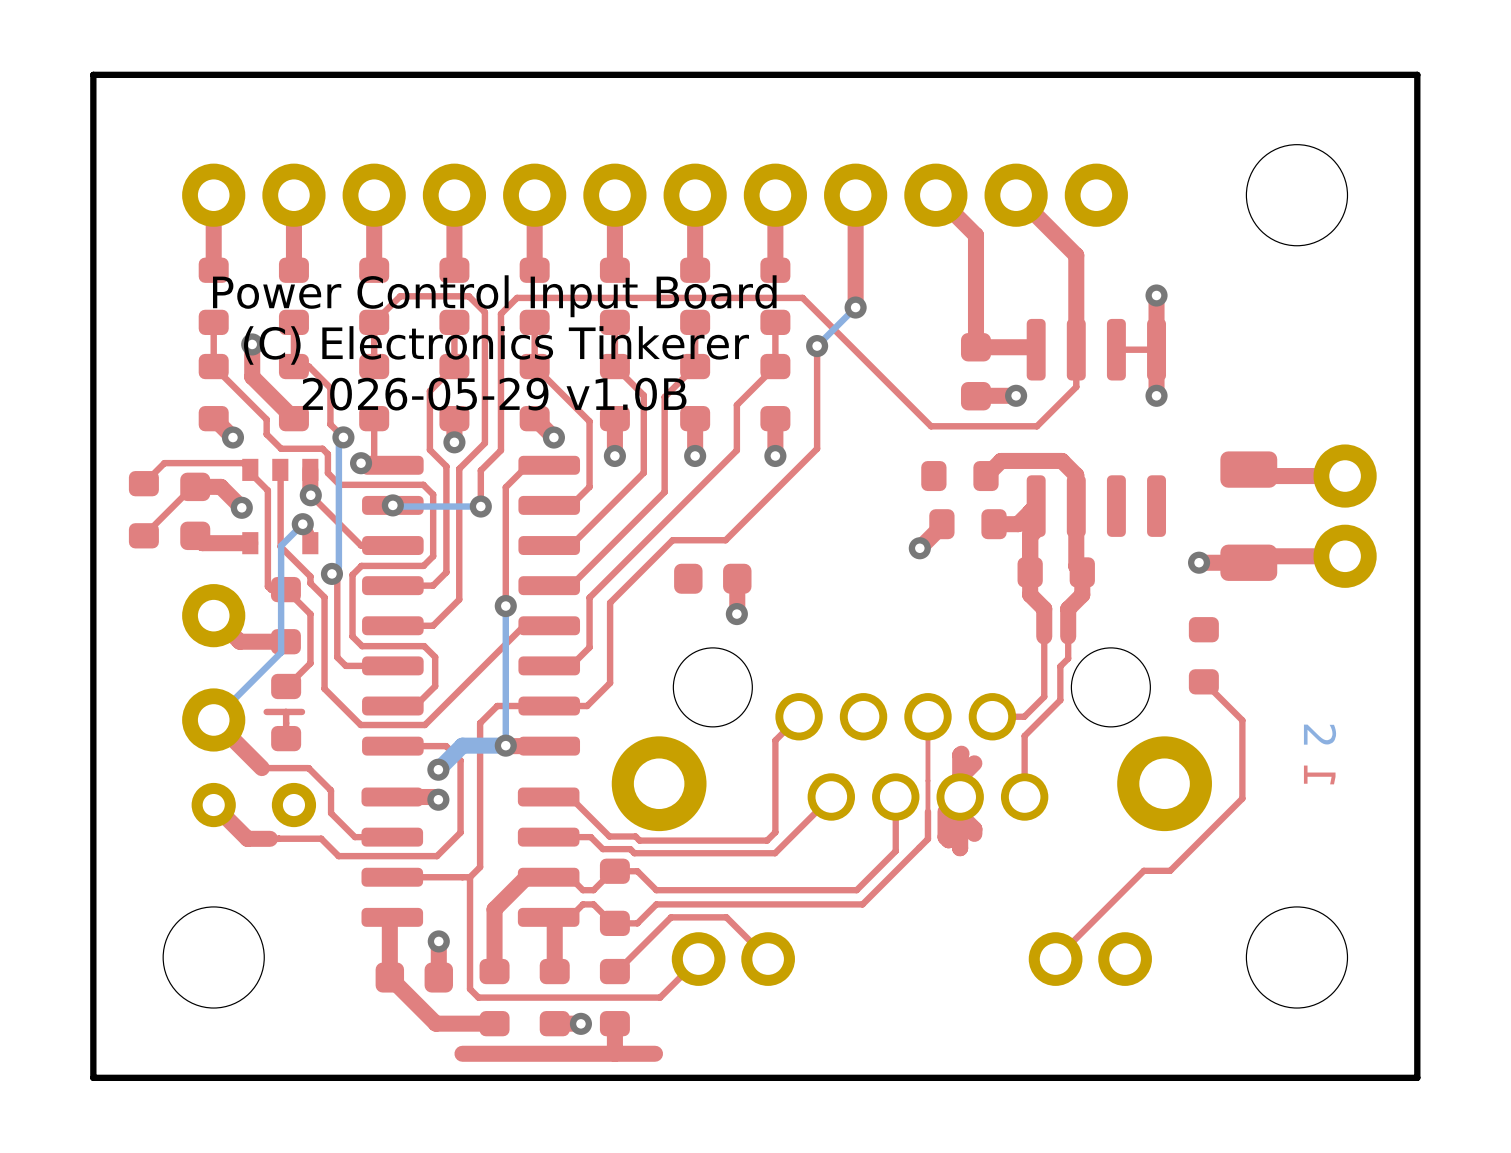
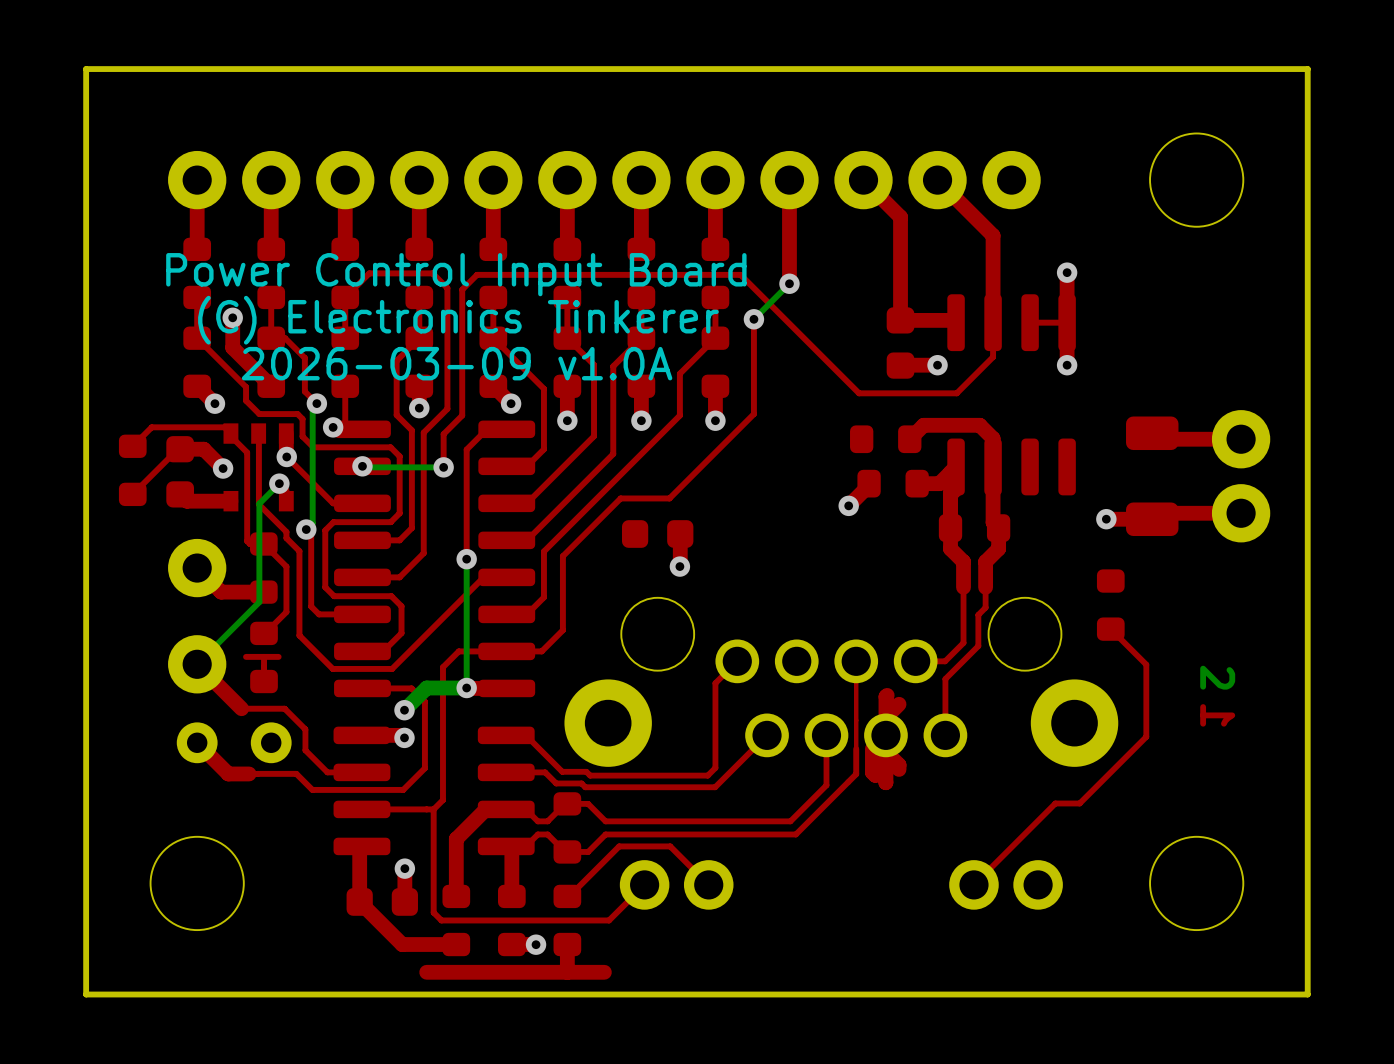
text: 2026-05-29 v1.0B (494, 394) -> 2026-03-09 v1.0A (457, 363)

